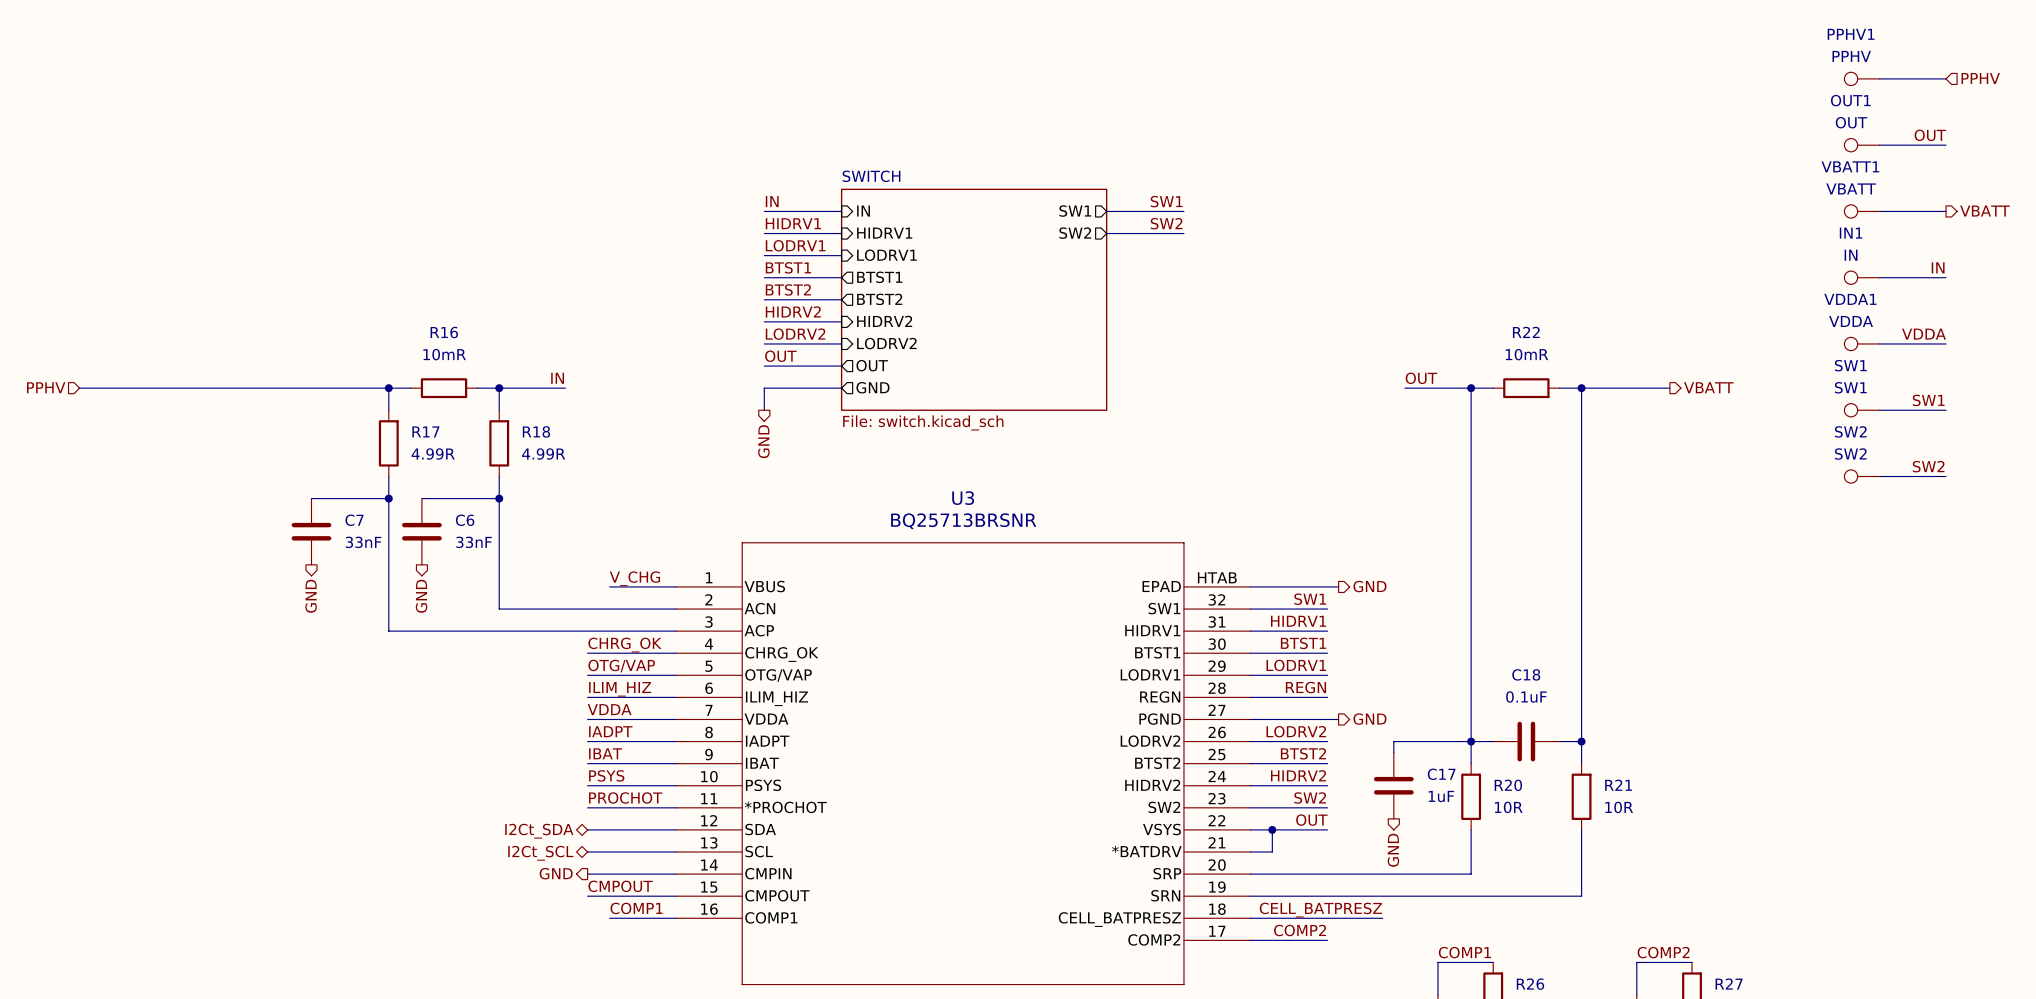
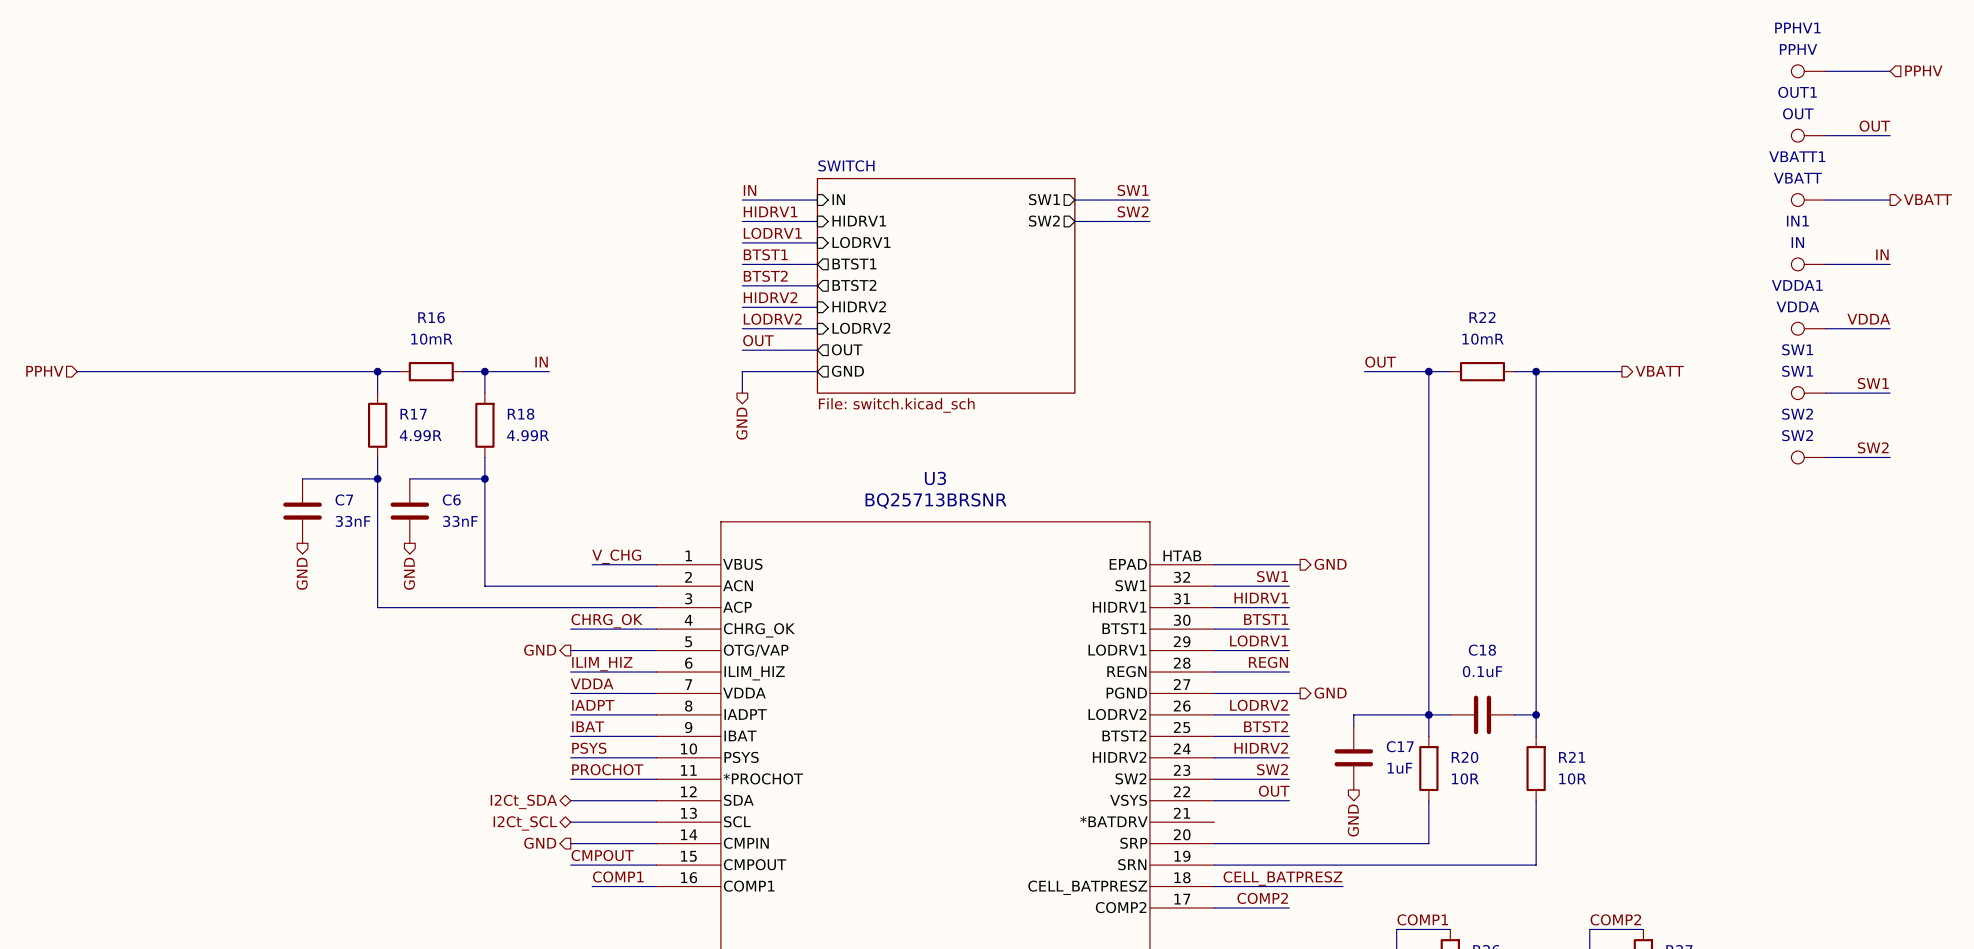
label: OTG/VAP (621, 666) -> none
hierarchical label: none -> GND (540, 650)
wire: (1272, 829) (1272, 852) (1250, 852) -> none
junction: (1272, 829) -> none

